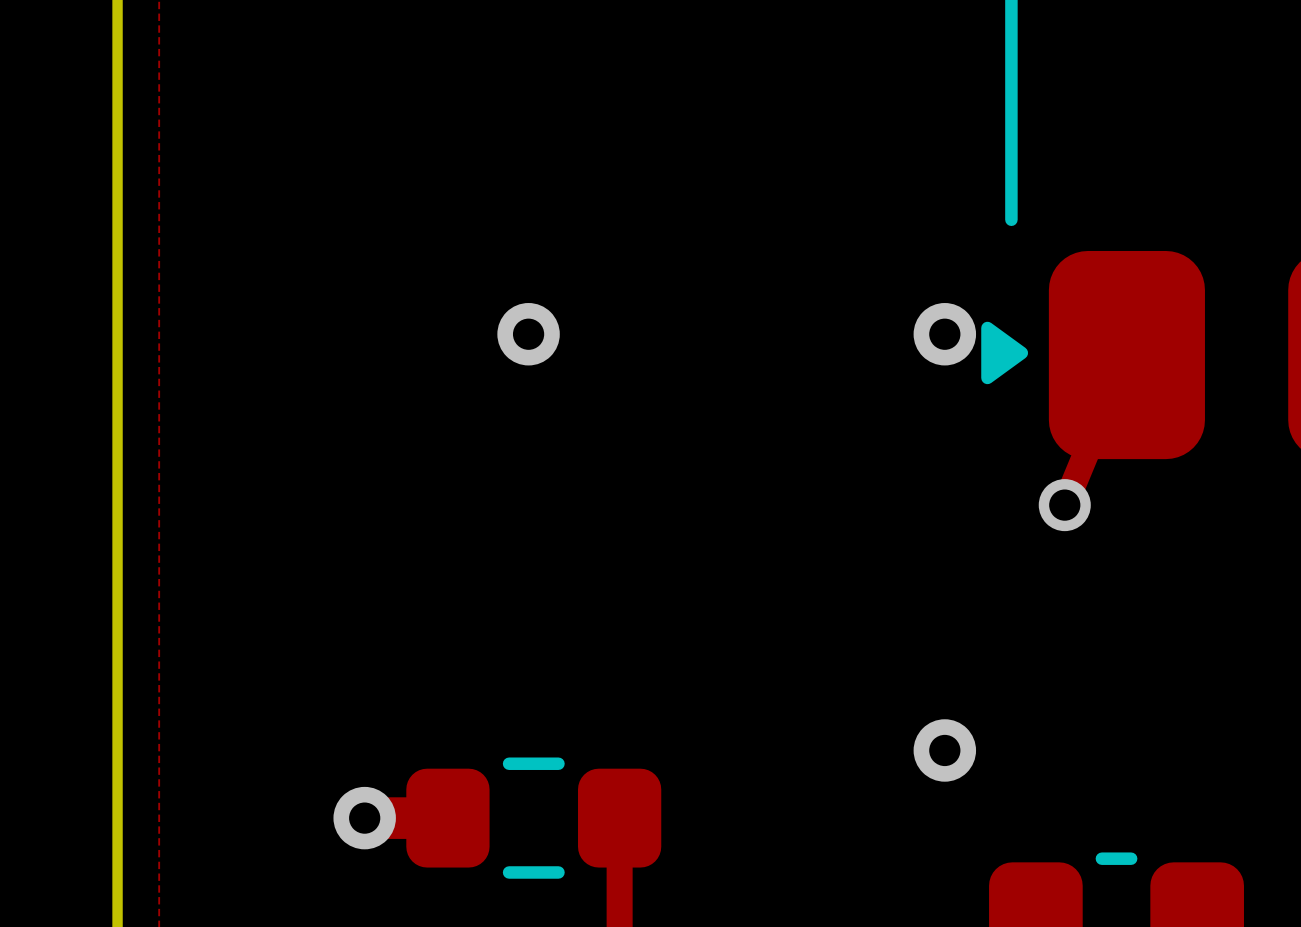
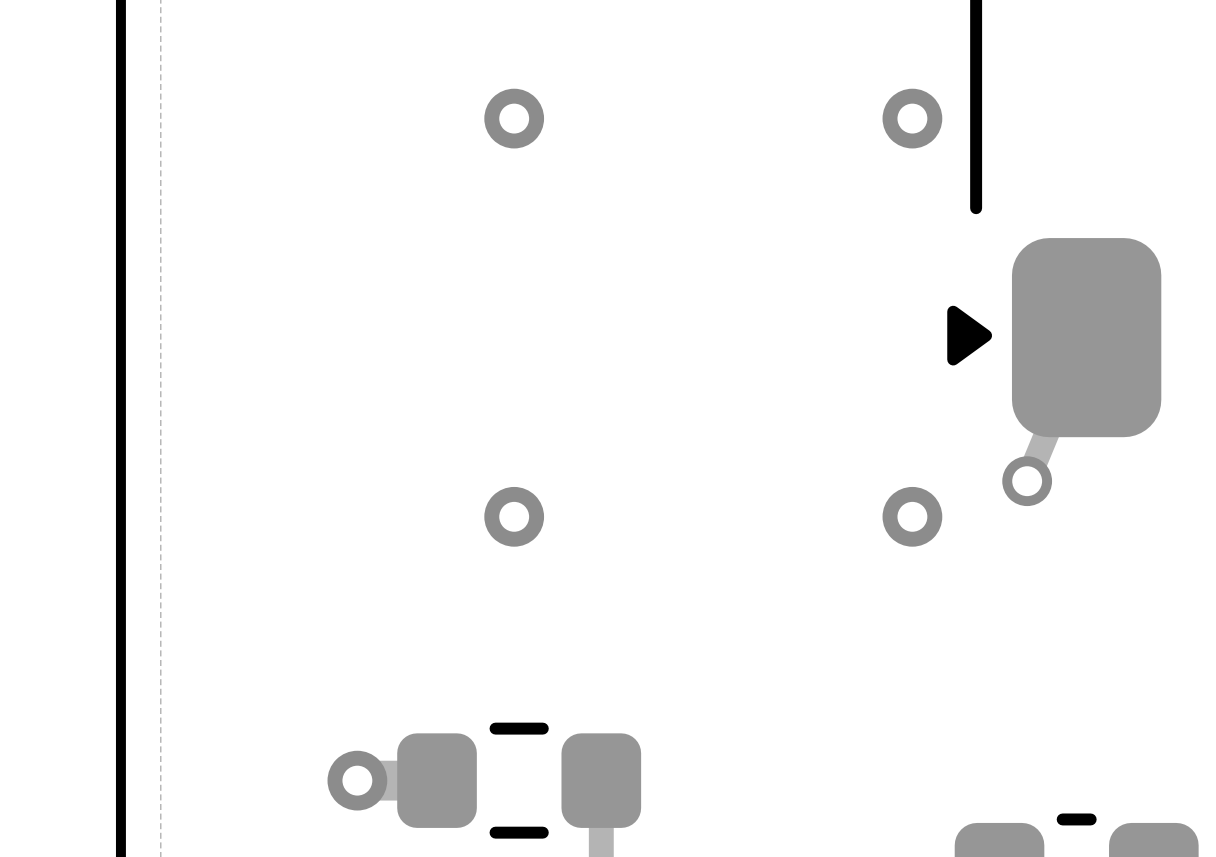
via: none -> (514, 118)
via: none -> (912, 118)
via: (528, 334) -> none
via: (944, 334) -> none
via: none -> (514, 516)
via: none -> (912, 516)
via: (944, 750) -> none

